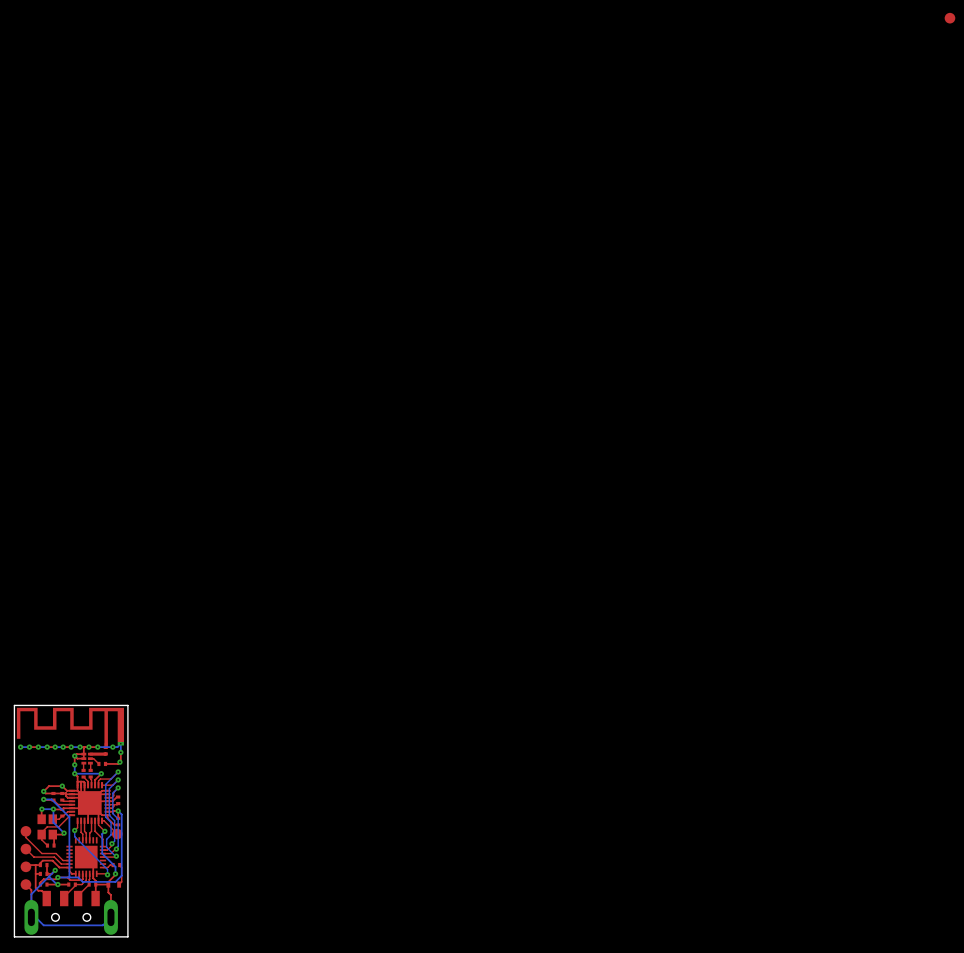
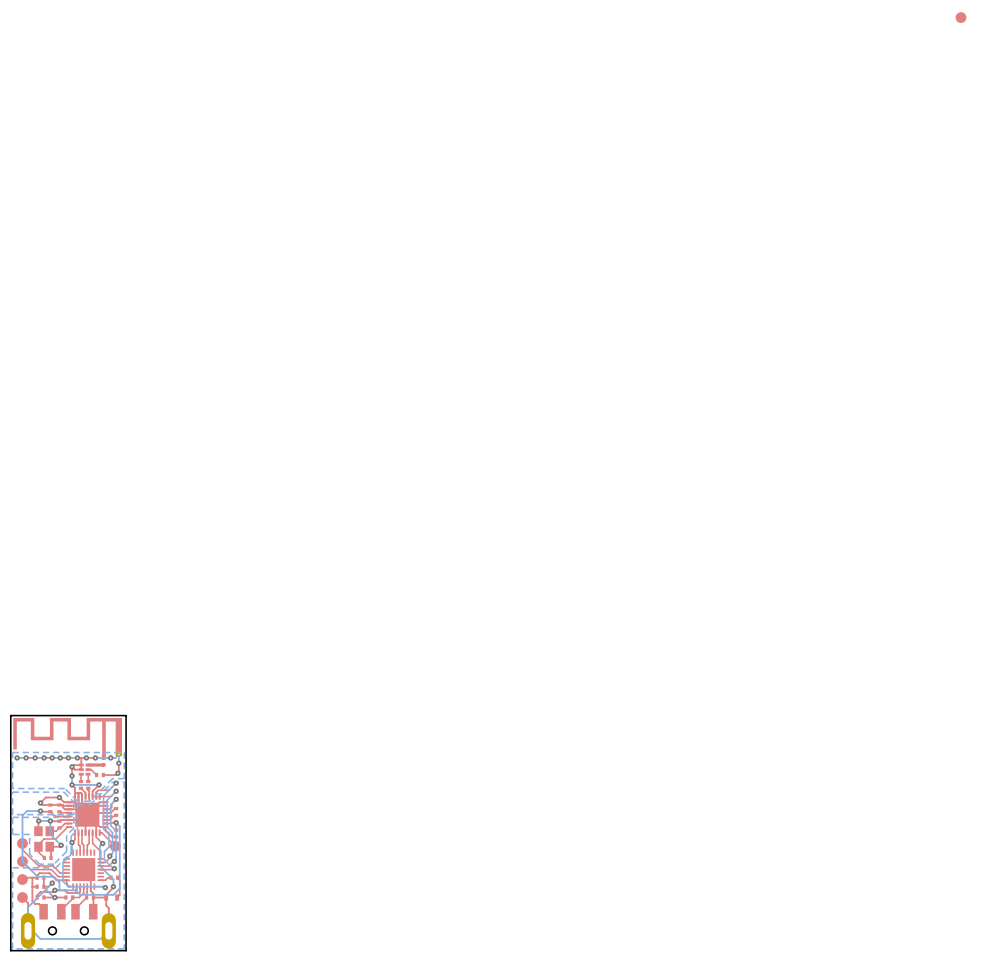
bottom zone outline: none -> (124, 752) (12, 752) (12, 788) (64, 788) (77, 801) (90, 801) (112, 778) (124, 778) (124, 752)
bottom zone outline: none -> (124, 782) (124, 948) (12, 948) (12, 867) (55, 867) (71, 852) (71, 836) (77, 829) (77, 804) (90, 804) (112, 782) (124, 782)
bottom zone outline: none -> (63, 792) (12, 792) (12, 814) (73, 814) (73, 802) (63, 792)
bottom track: (43, 799) (51, 799) (69, 817) (69, 877) -> (40, 811) (26, 811) (22, 815) (22, 861) (37, 876) (54, 876) (59, 882) (59, 890)
bottom zone outline: none -> (73, 817) (73, 828) (66, 835) (66, 851) (54, 864) (39, 864) (29, 854) (29, 834) (12, 834) (12, 817) (73, 817)
bottom track: (74, 836) (107, 869) (107, 874) -> (72, 848) (72, 853) (63, 862) (63, 881) (68, 886) (105, 887)

